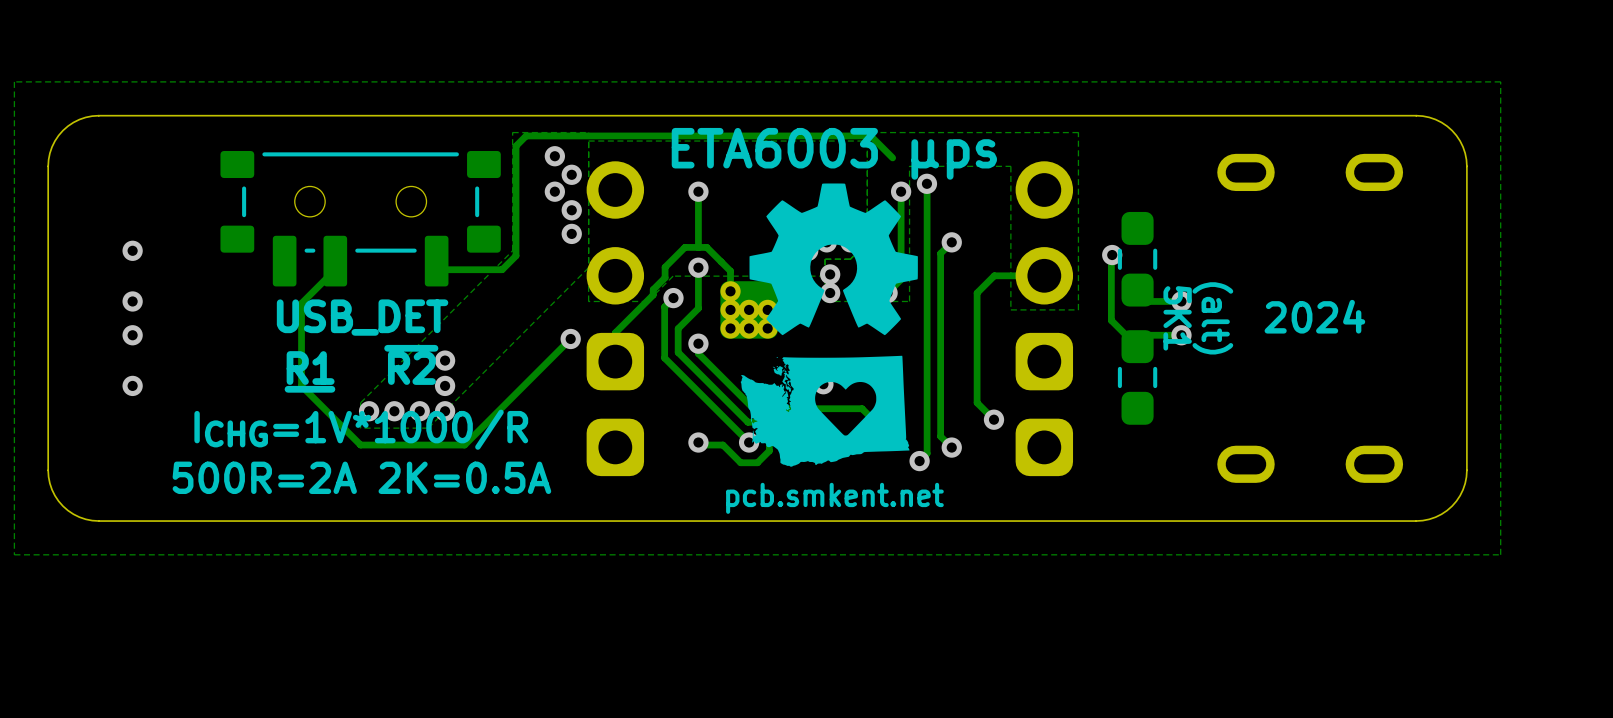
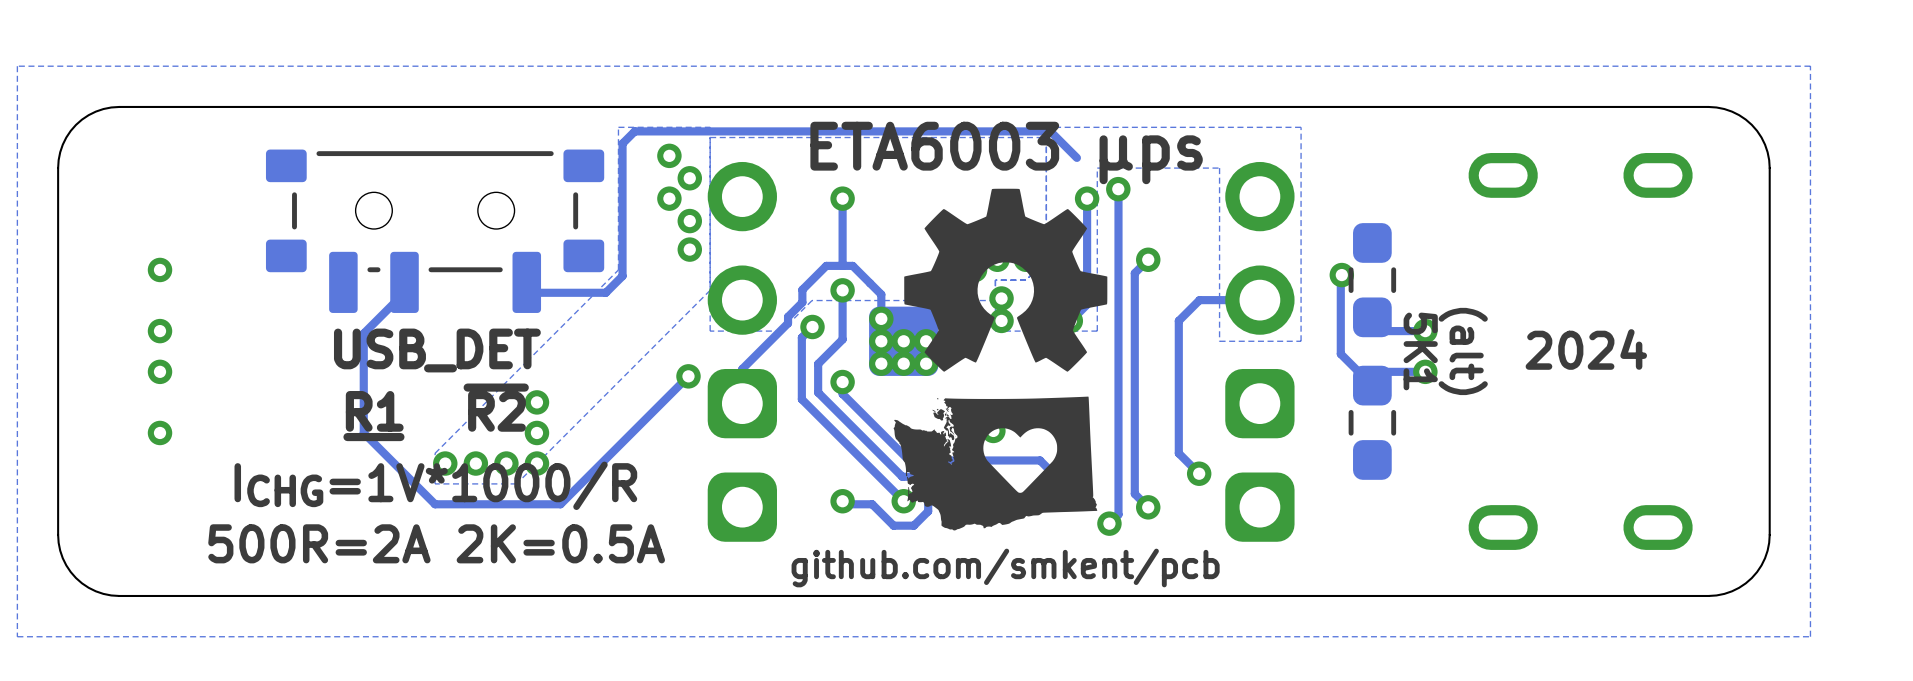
text: pcb.smkent.net (834, 498) -> github.com/smkent/pcb (1005, 567)

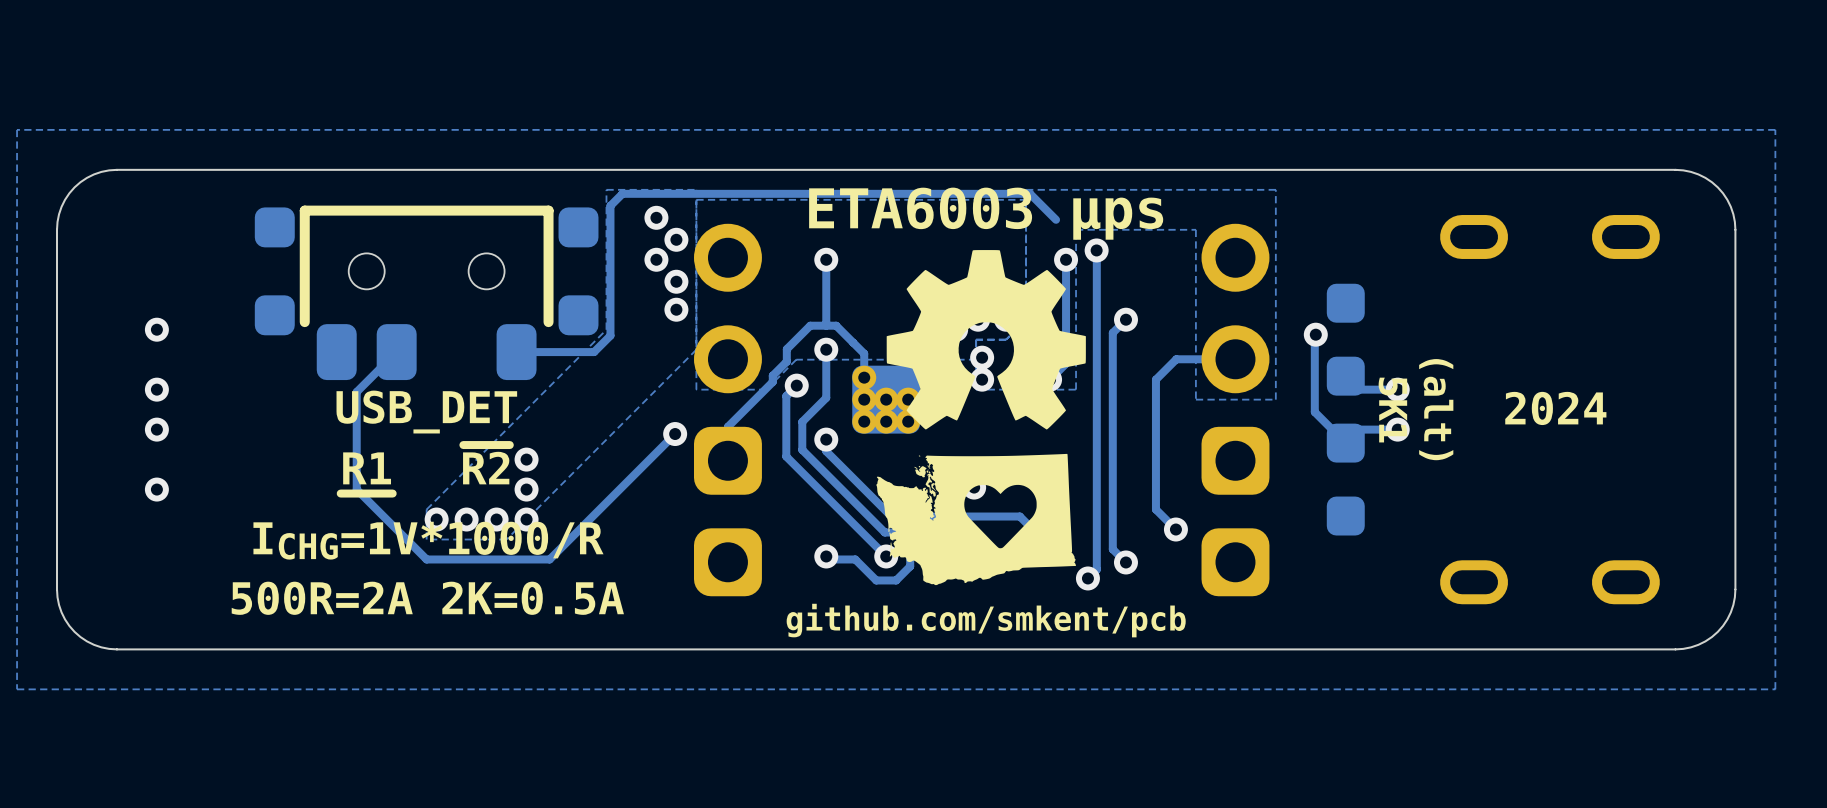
part footprint: [265, 149, 605, 313] -> [254, 205, 599, 381]
part footprint: [1348, 223, 1397, 338] -> [1326, 283, 1365, 396]
part footprint: [1348, 365, 1397, 480] -> [1326, 423, 1365, 536]

